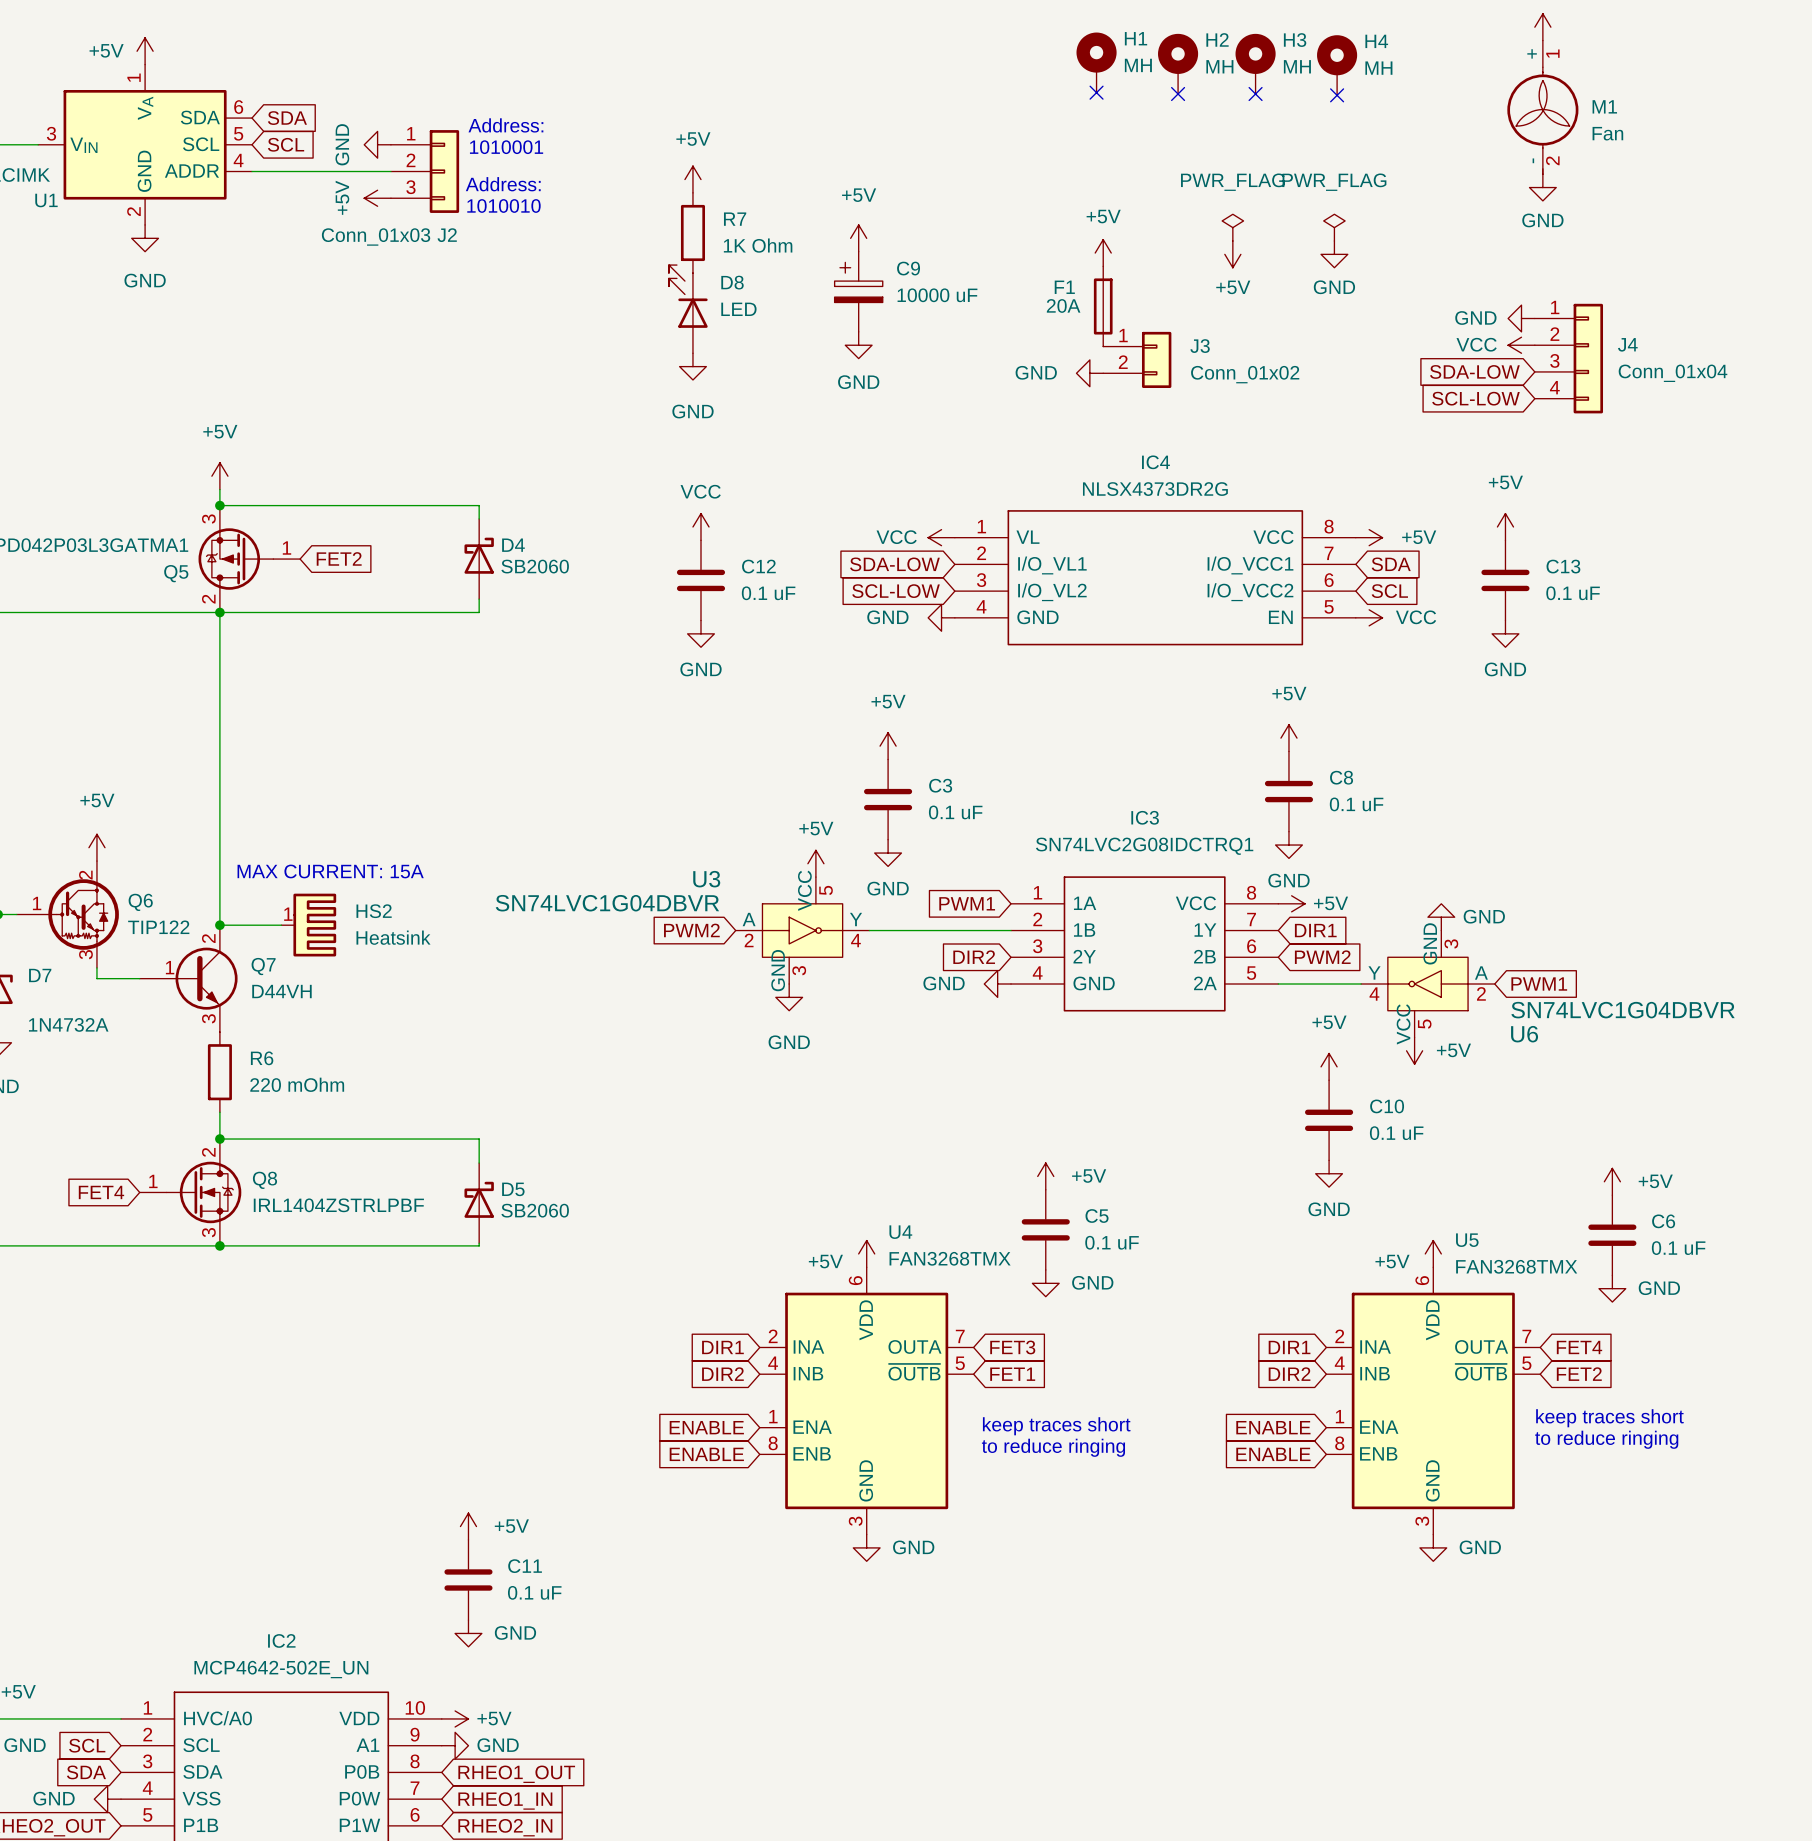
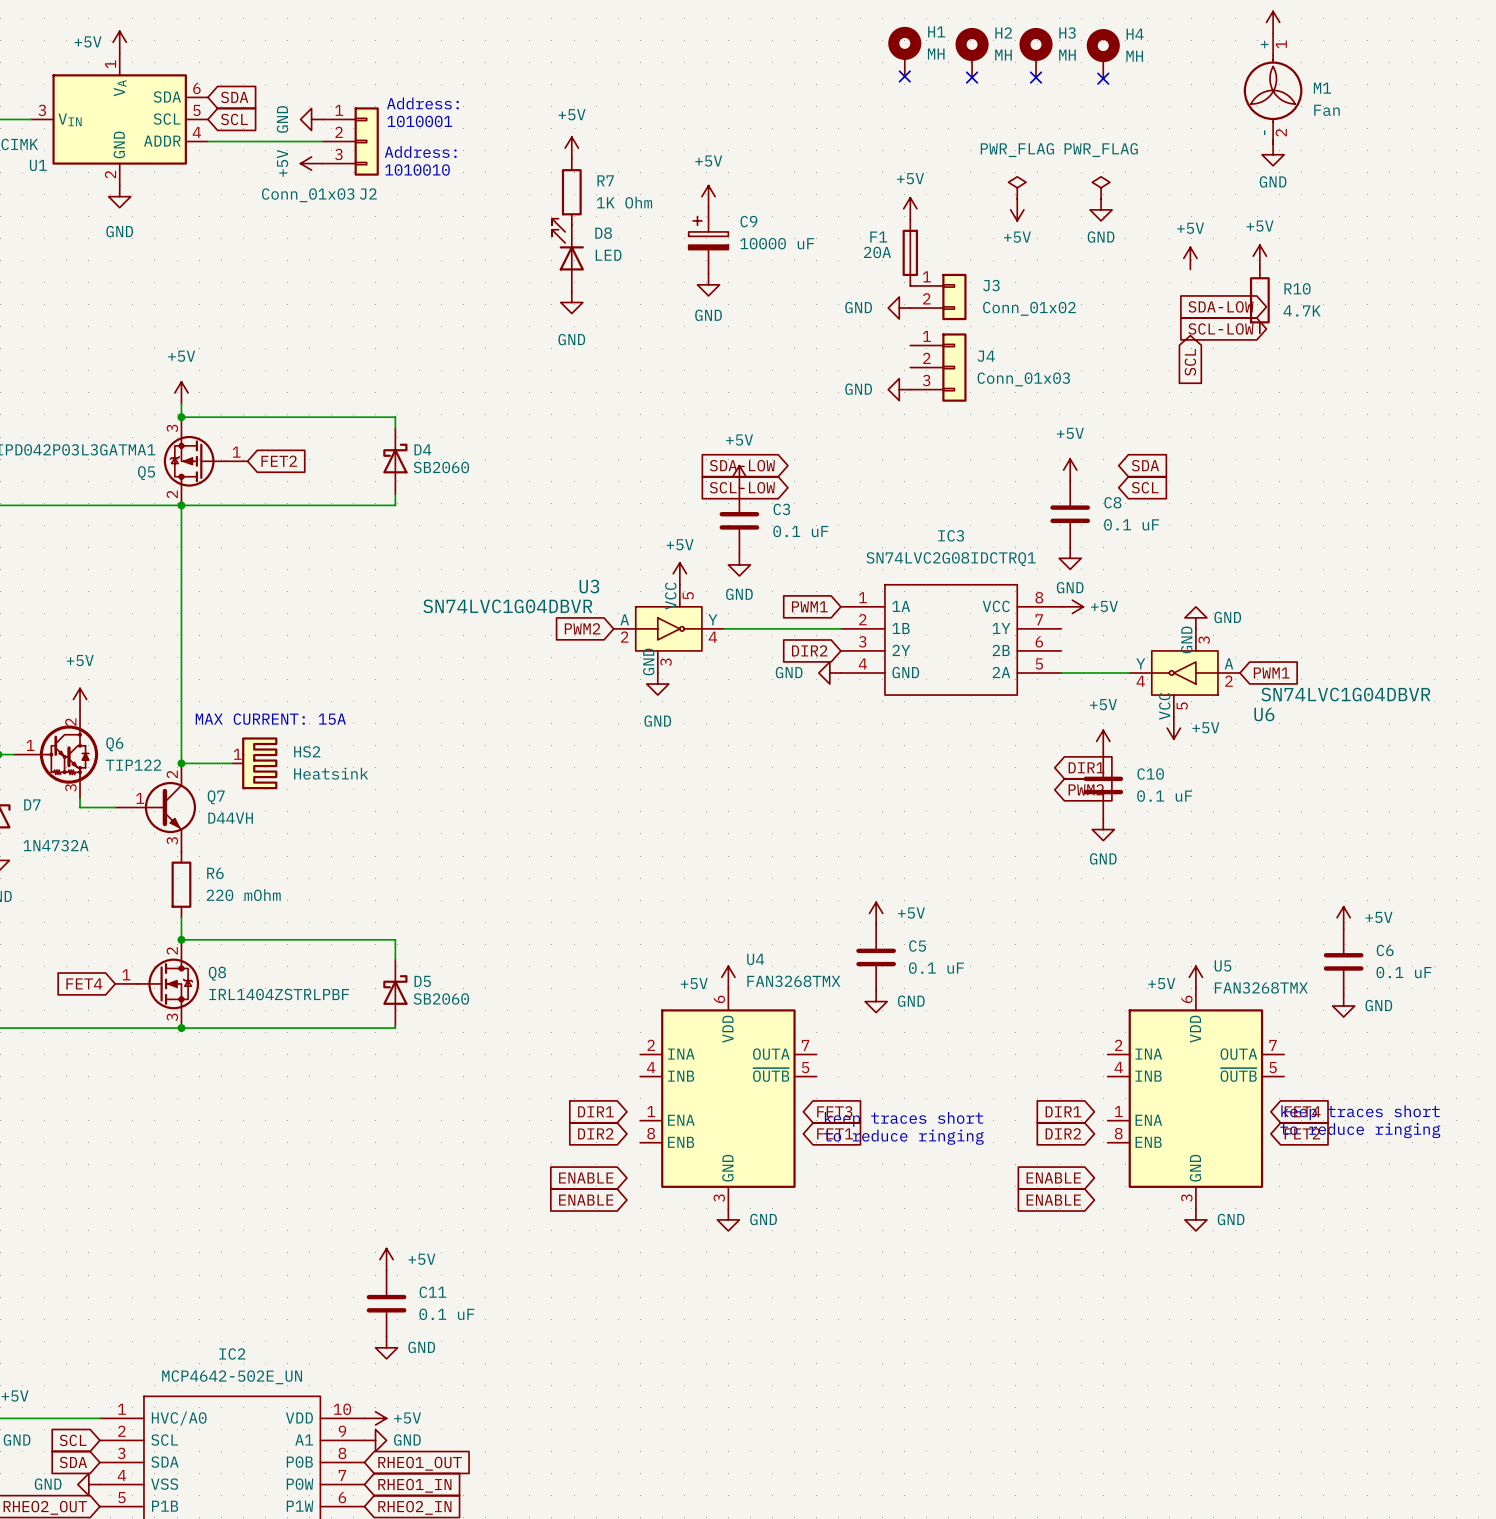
J4 symbol: [1534, 303, 1604, 414] -> [910, 333, 967, 402]
power symbol: none -> +5V (1190, 258)
power symbol: GND (1521, 318) -> +5V (1259, 256)
power symbol: VCC (1521, 345) -> none
R10: none -> 4.7K (1259, 300)
J4 value: Conn_01x04 (1673, 373) -> Conn_01x03 (1023, 379)
global label: none -> SCL (1190, 362)
power symbol: none -> GND (899, 389)
power symbol: VCC (700, 526) -> none
power symbol: +5V (1505, 526) -> none
power symbol: VCC (941, 537) -> none
power symbol rotation: 0° (1369, 537) -> 90° counterclockwise (1070, 470)
power symbol position: +5V (1369, 537) -> +5V (1070, 470)
power symbol: none -> +5V (739, 476)
IC4: NLSX4373DR2G (1155, 577) -> none
C12: 0.1 uF (700, 580) -> none
C13: 0.1 uF (1505, 580) -> none
power symbol text position: GND (887, 617) -> GND (739, 594)
power symbol rotation: 0° (941, 617) -> 90° counterclockwise (739, 564)
power symbol position: GND (941, 617) -> GND (739, 564)
power symbol: VCC (1369, 617) -> none
power symbol: GND (700, 633) -> none
power symbol: GND (1505, 633) -> none
power symbol: none -> GND (1070, 558)
power symbol text position: +5V (888, 701) -> +5V (680, 544)
power symbol rotation: 0° (1288, 738) -> 90° clockwise (1072, 606)
power symbol position: +5V (888, 746) -> +5V (679, 573)
power symbol: none -> GND (1195, 617)
C8 position: (1288, 791) -> (1070, 514)
C3 position: (888, 799) -> (739, 520)
power symbol: none -> GND (829, 672)
power symbol: none -> GND (657, 684)
power symbol: GND (1288, 845) -> none
power symbol: GND (888, 853) -> none
power symbol: +5V (815, 863) -> none
power symbol: none -> +5V (1173, 728)
global label position: PWM1 (967, 903) -> PWM1 (809, 606)
power symbol rotation: 0° (1291, 903) -> 90° counterclockwise (1103, 741)
power symbol position: +5V (1291, 903) -> +5V (1103, 741)
power symbol: GND (1441, 917) -> none
global label position: PWM2 (691, 930) -> PWM2 (582, 628)
U3 position: (802, 930) -> (668, 628)
wire: (869, 930) (1011, 930) -> (723, 628) (840, 628)
IC3 position: (1144, 943) -> (951, 639)
global label position: DIR2 (974, 957) -> DIR2 (809, 650)
power symbol: GND (997, 984) -> none
wire: (1278, 984) (1361, 984) -> (1061, 672) (1129, 672)
U6 position: (1427, 984) -> (1184, 672)
global label position: PWM1 (1539, 984) -> PWM1 (1271, 672)
power symbol: GND (789, 997) -> none
power symbol: none -> GND (1103, 829)
power symbol: +5V (1414, 1050) -> none
power symbol: +5V (1329, 1066) -> none
C10 position: (1329, 1120) -> (1103, 785)
power symbol: GND (1329, 1173) -> none
power symbol position: +5V (1045, 1176) -> +5V (876, 913)
power symbol position: +5V (1612, 1181) -> +5V (1343, 917)
power symbol: none -> +5V (1195, 977)
C5 position: (1045, 1229) -> (876, 957)
C6 position: (1612, 1235) -> (1343, 961)
power symbol position: +5V (866, 1253) -> +5V (728, 977)
power symbol: +5V (1433, 1253) -> none
power symbol position: GND (1045, 1283) -> GND (876, 1001)
power symbol position: GND (1612, 1288) -> GND (1343, 1005)
U4 position: (866, 1400) -> (728, 1098)
U5 position: (1433, 1400) -> (1195, 1098)
text position: keep traces short (1609, 1418) -> keep traces short (1360, 1112)
text position: keep traces short (1056, 1426) -> keep traces short (904, 1119)
text position: to reduce ringing (1606, 1439) -> to reduce ringing (1360, 1130)
text position: to reduce ringing (1053, 1447) -> to reduce ringing (903, 1137)
power symbol position: GND (866, 1547) -> GND (728, 1219)
power symbol position: GND (1433, 1547) -> GND (1195, 1219)

